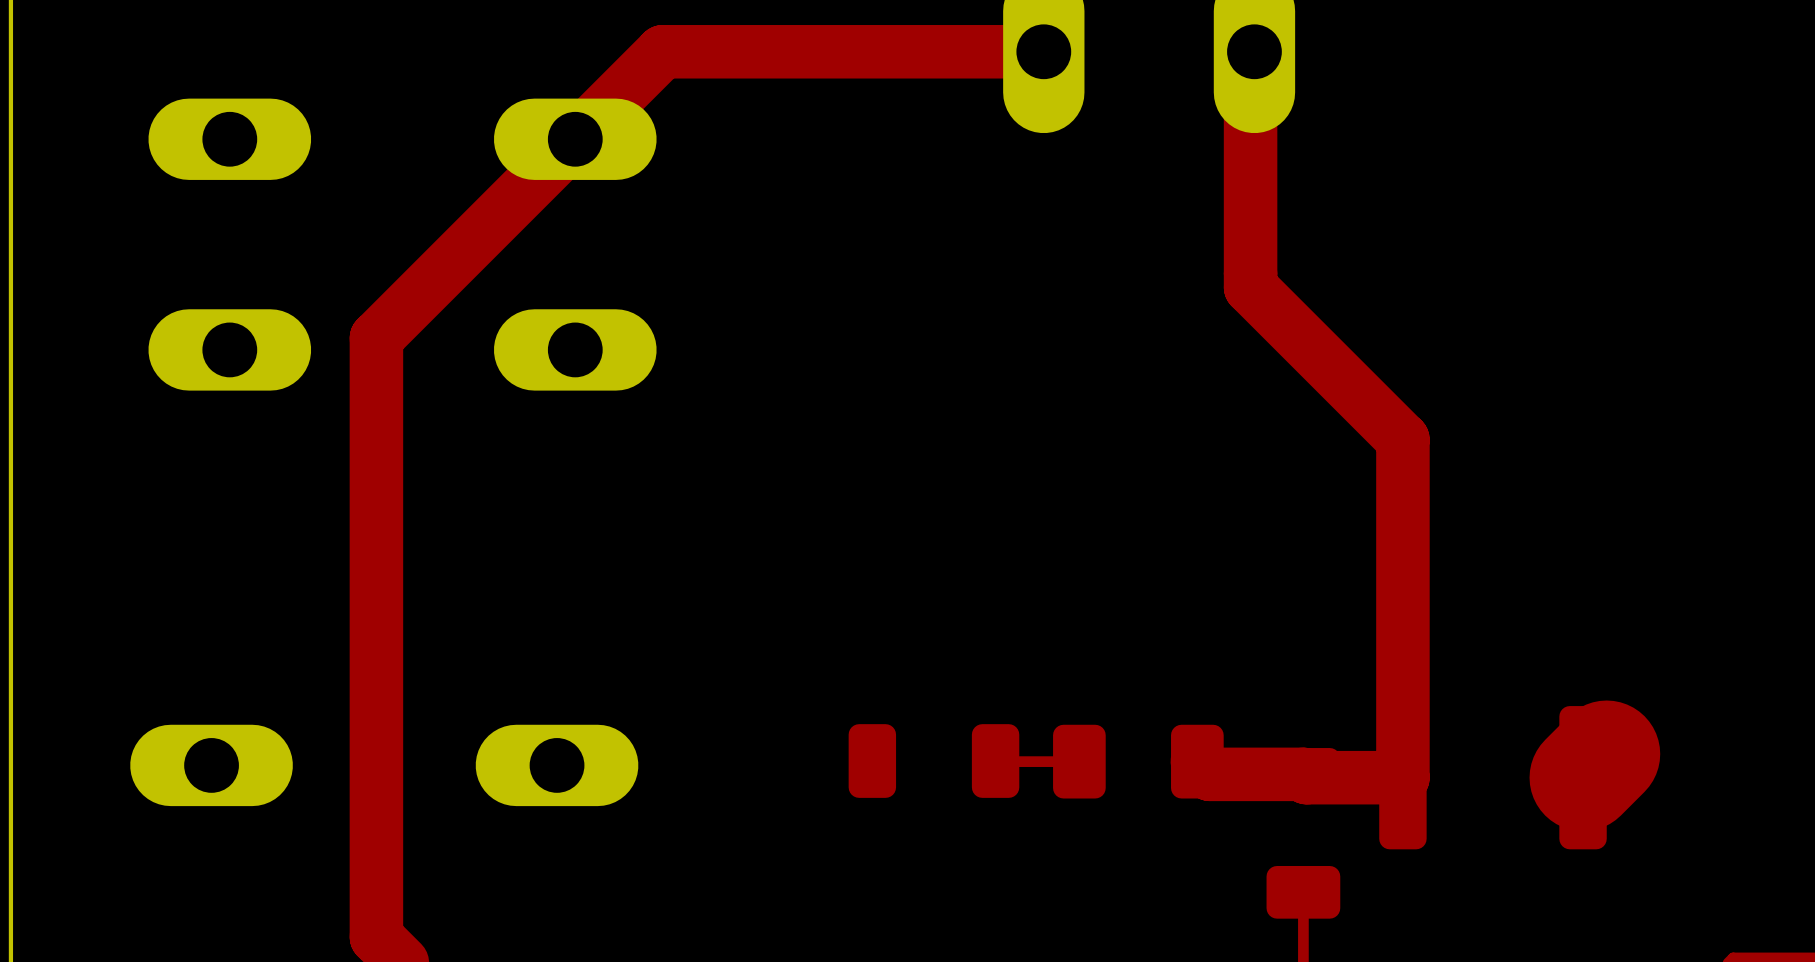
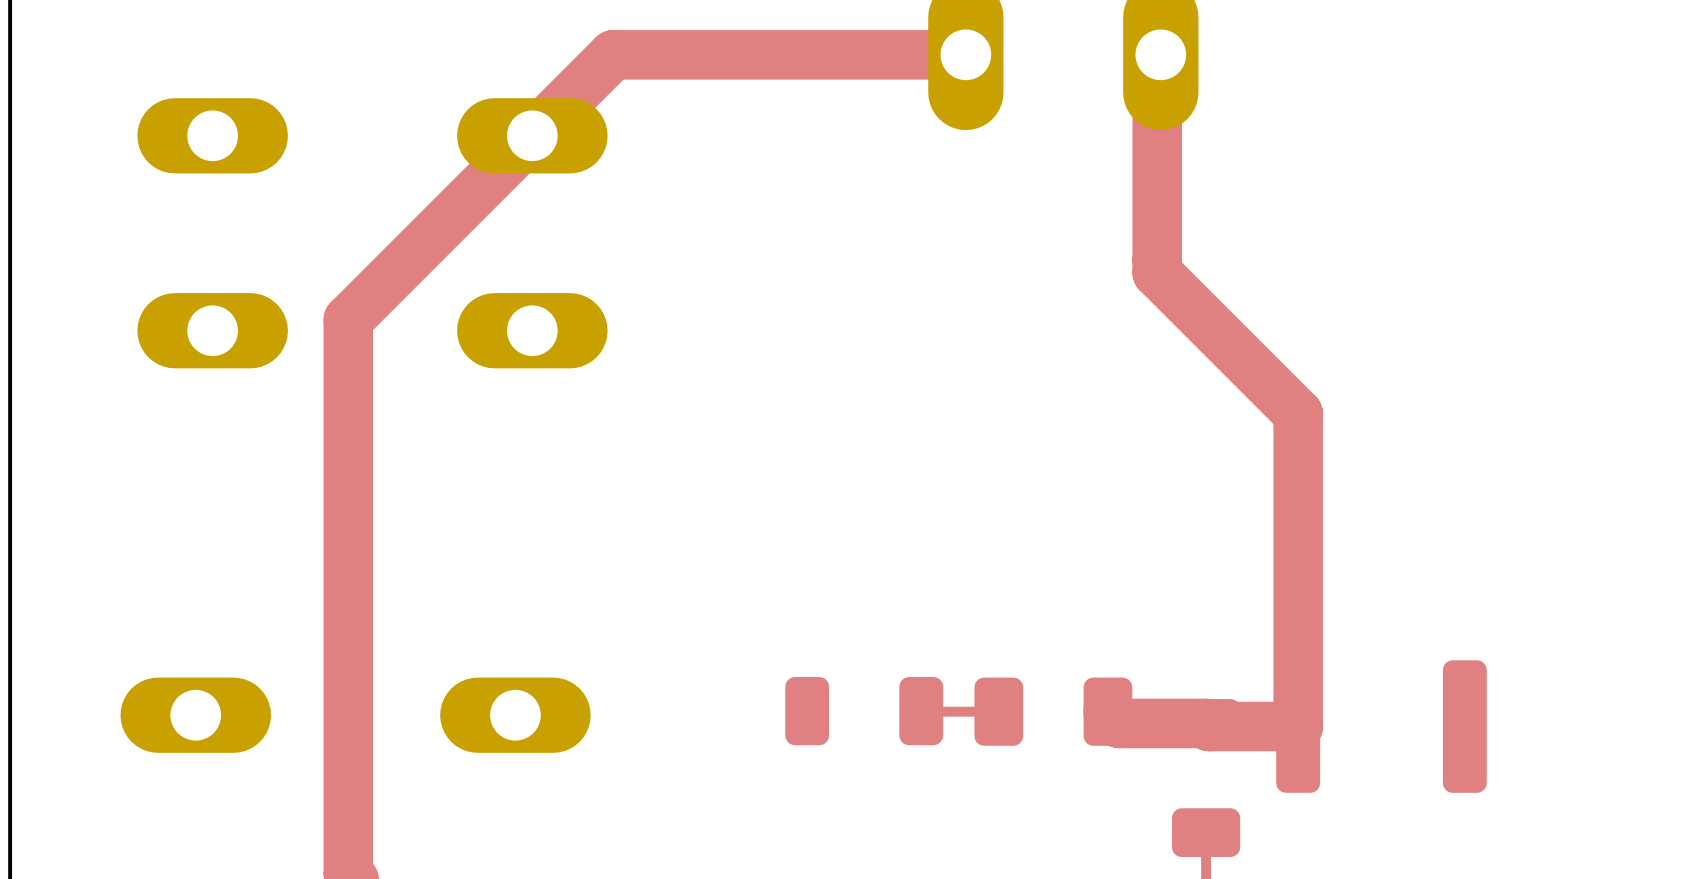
top track: (1606, 754) (1583, 777) -> none

